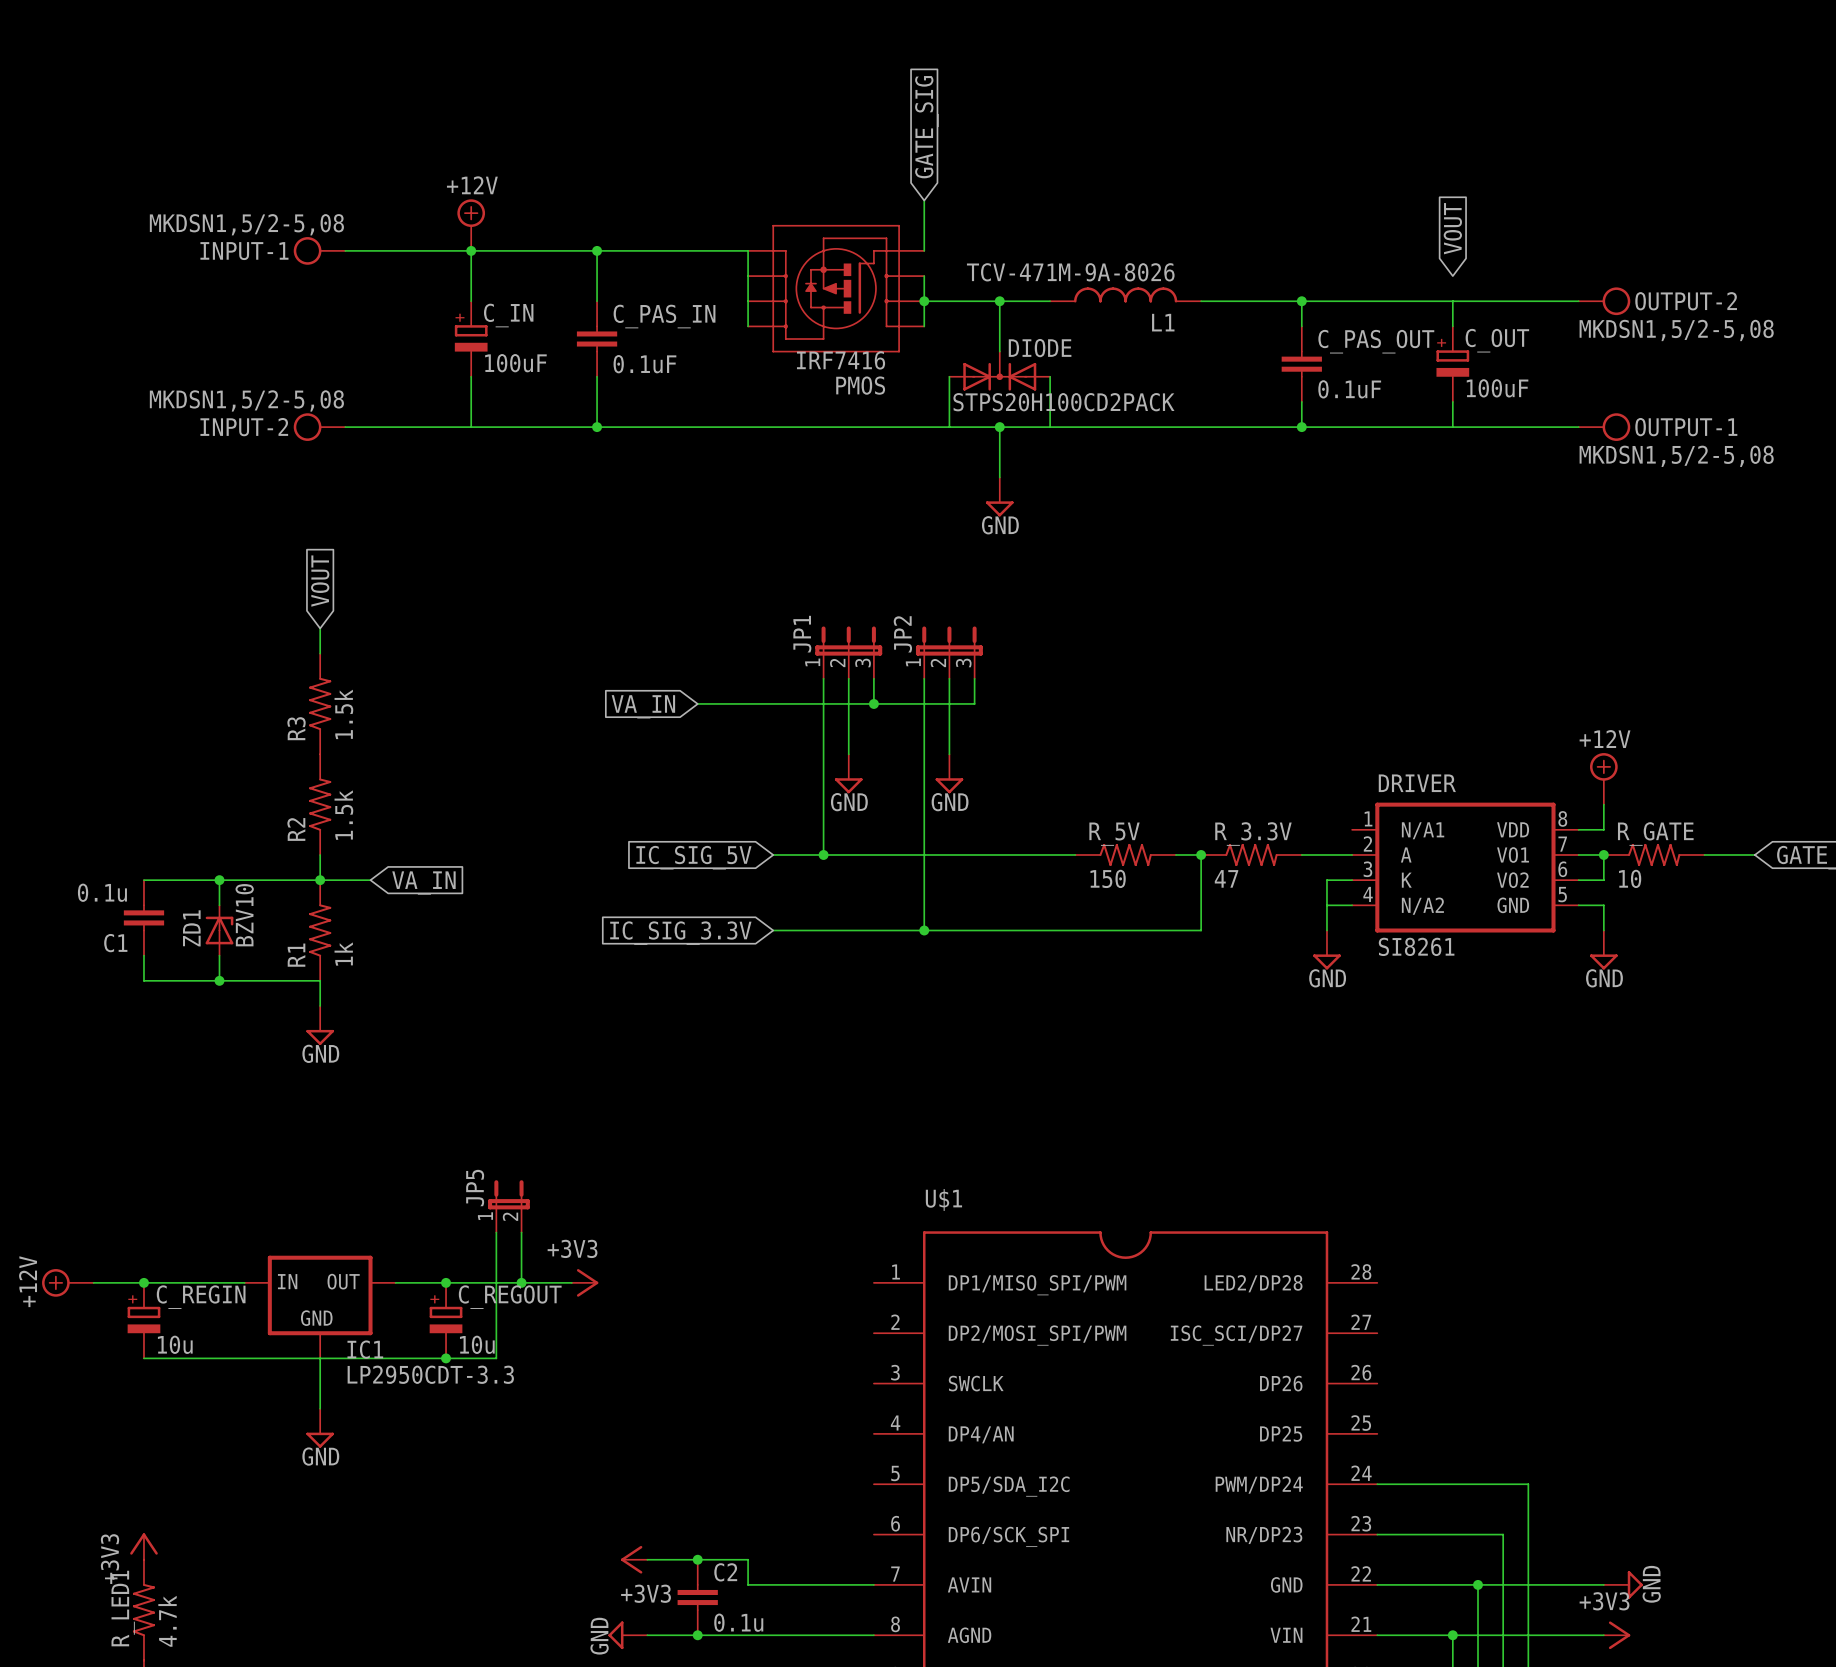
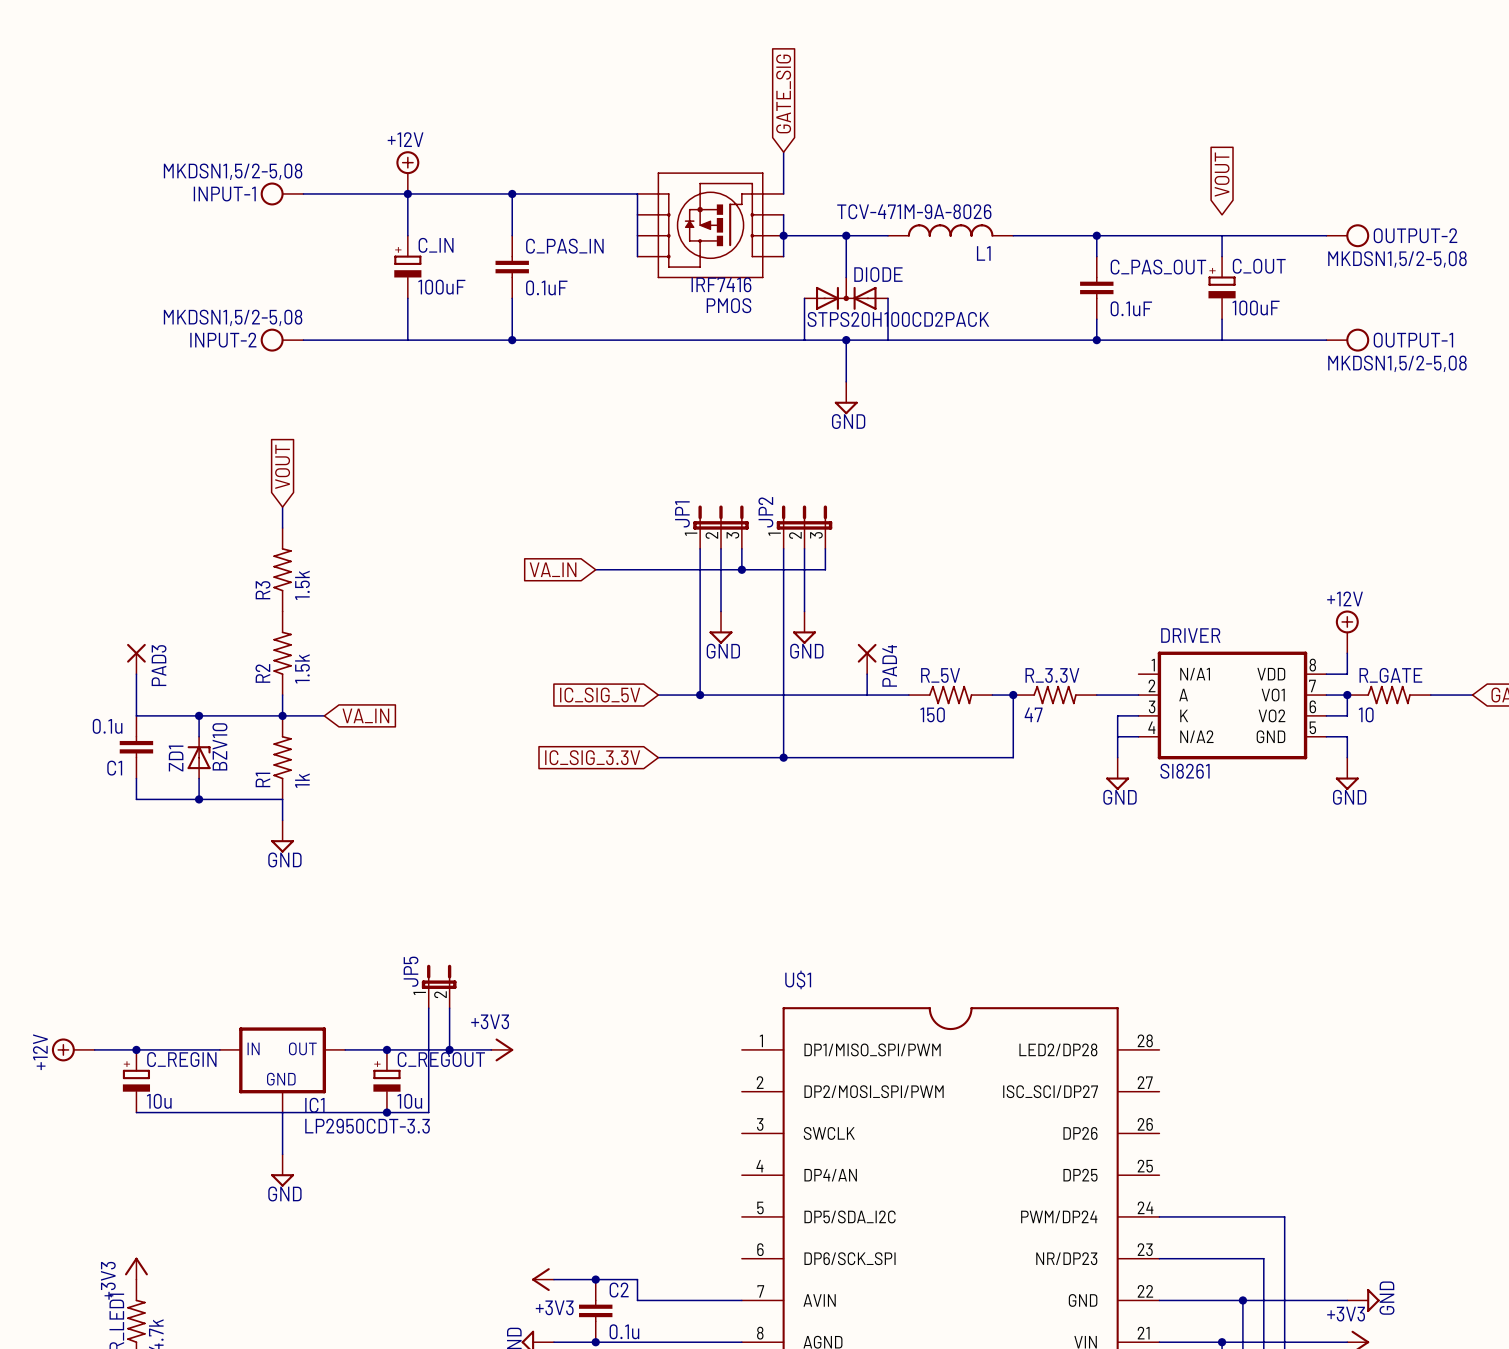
PAD3: none -> (136, 659)
PAD4: none -> (867, 659)
wire: none -> (136, 674) (136, 715)
wire: none -> (867, 674) (867, 695)

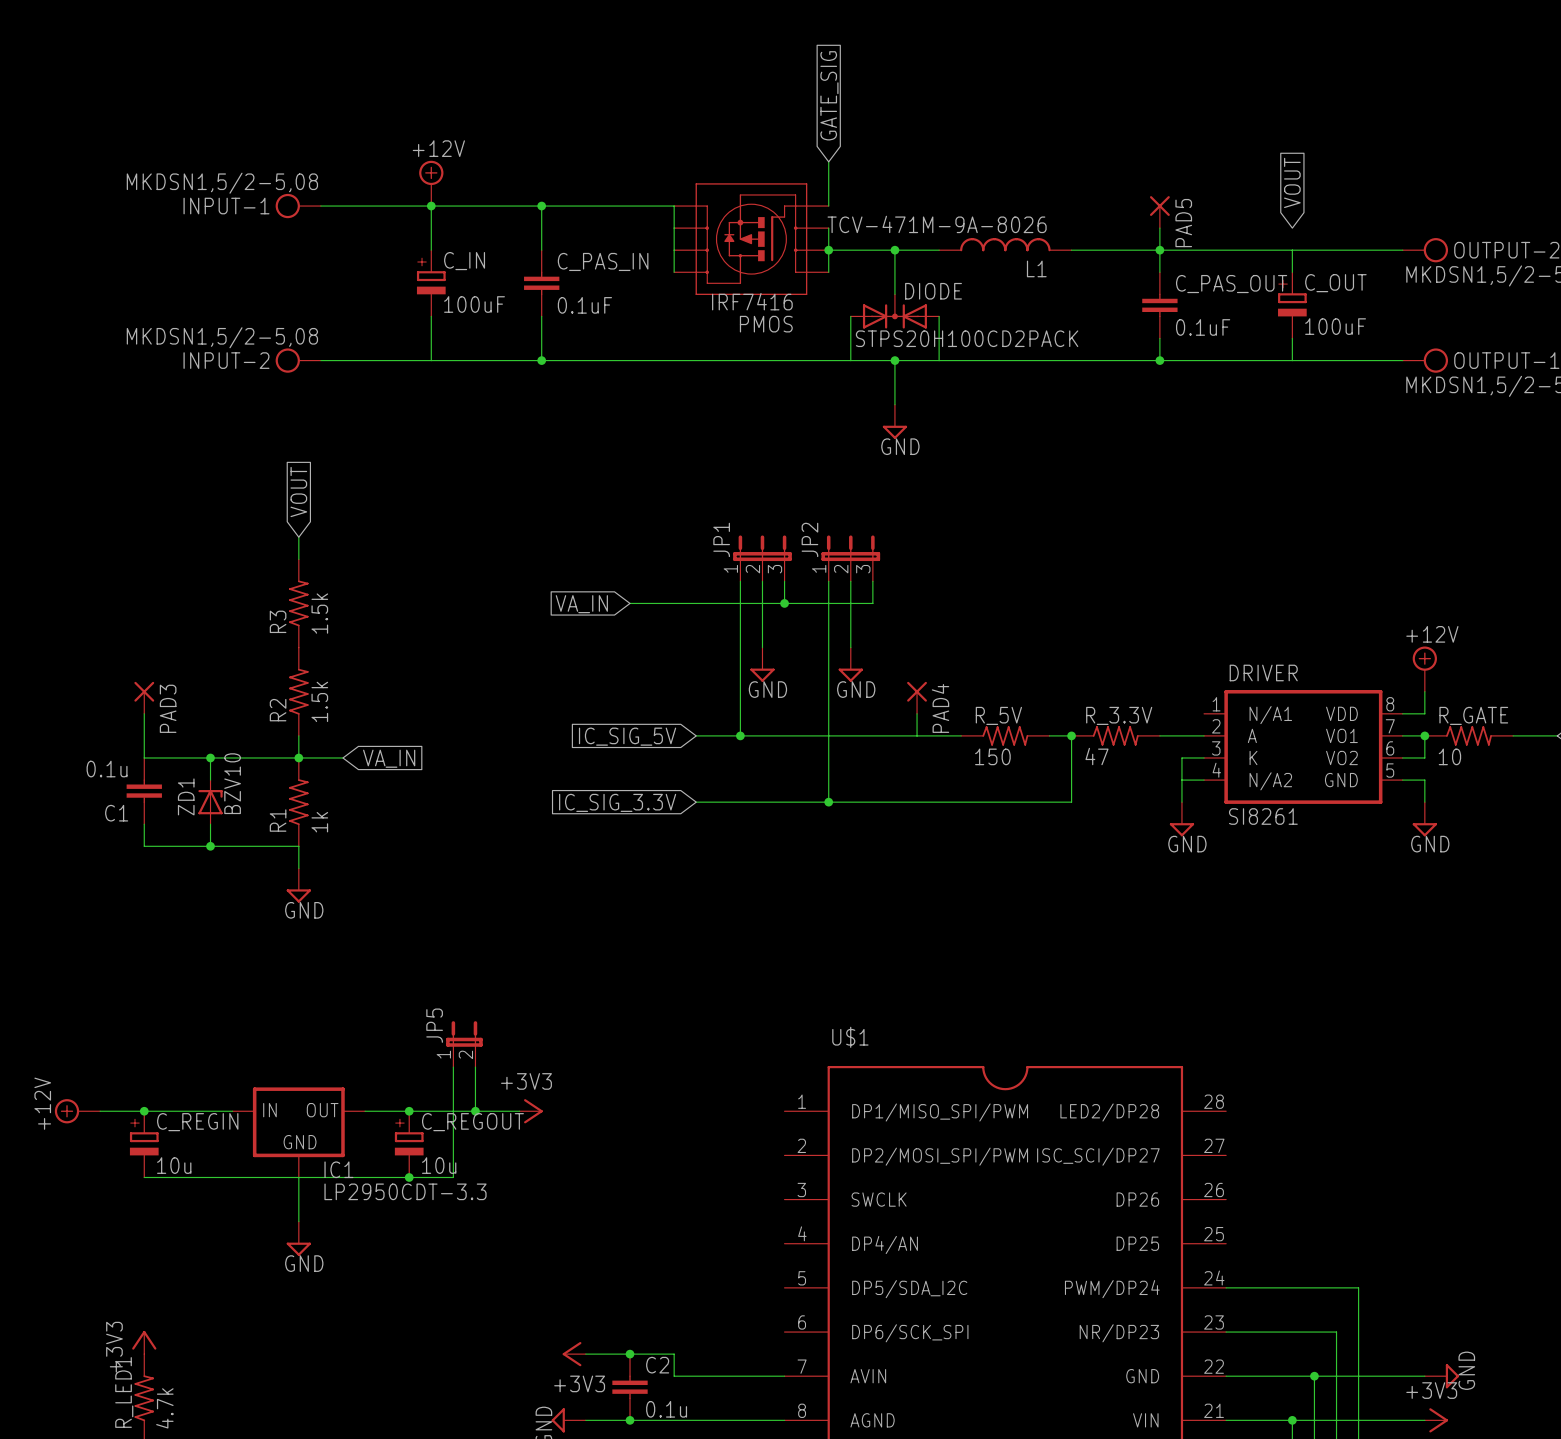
PAD5: none -> (1159, 212)
wire: none -> (1159, 228) (1159, 250)

